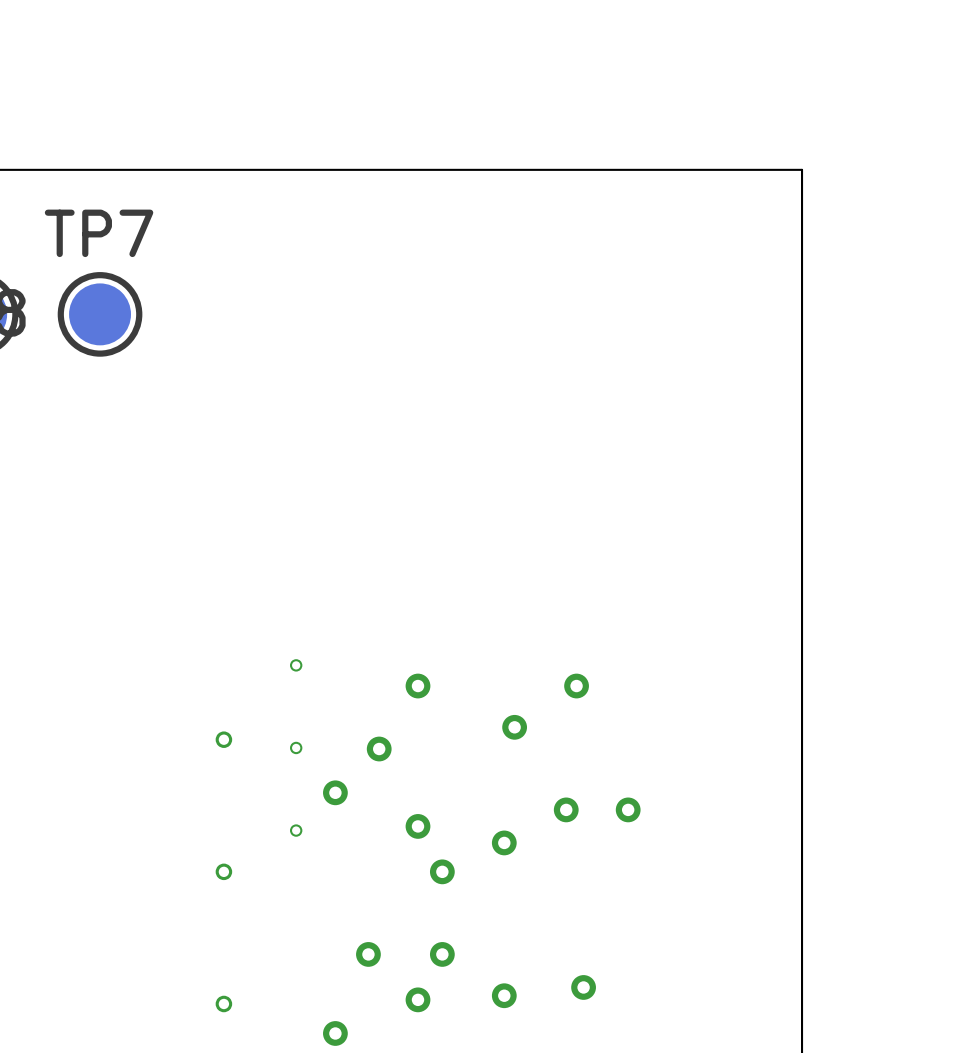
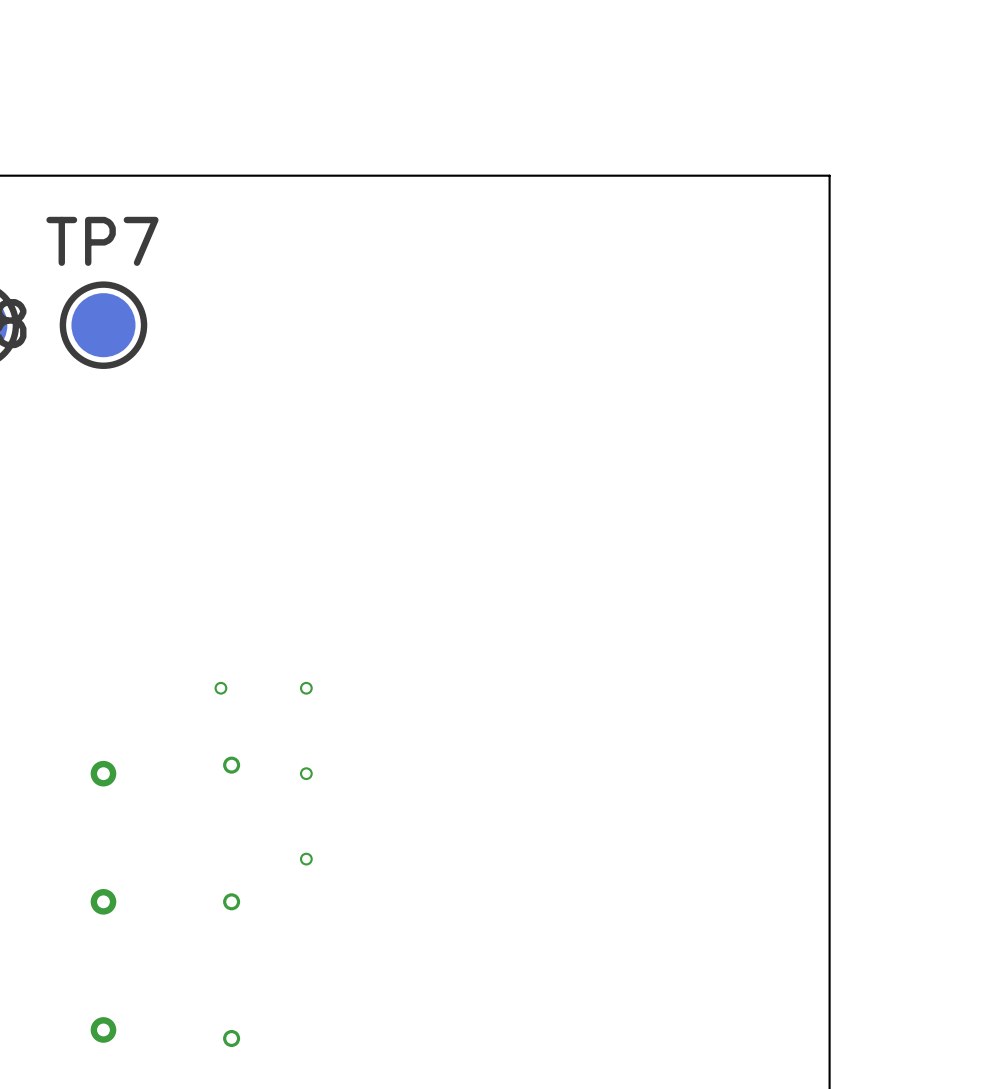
via: none -> (220, 688)
via: (417, 686) -> none
via: (576, 686) -> none
via: (514, 727) -> none
via: none -> (103, 773)
via: (379, 749) -> none
via: (335, 792) -> none
via: (566, 809) -> none
via: (628, 809) -> none
via: (417, 826) -> none
via: (504, 842) -> none
via: none -> (103, 901)
via: (442, 871) -> none
via: (368, 954) -> none
via: (442, 954) -> none
via: (583, 987) -> none
via: none -> (103, 1029)
via: (504, 995) -> none
via: (417, 999) -> none
via: (335, 1033) -> none

